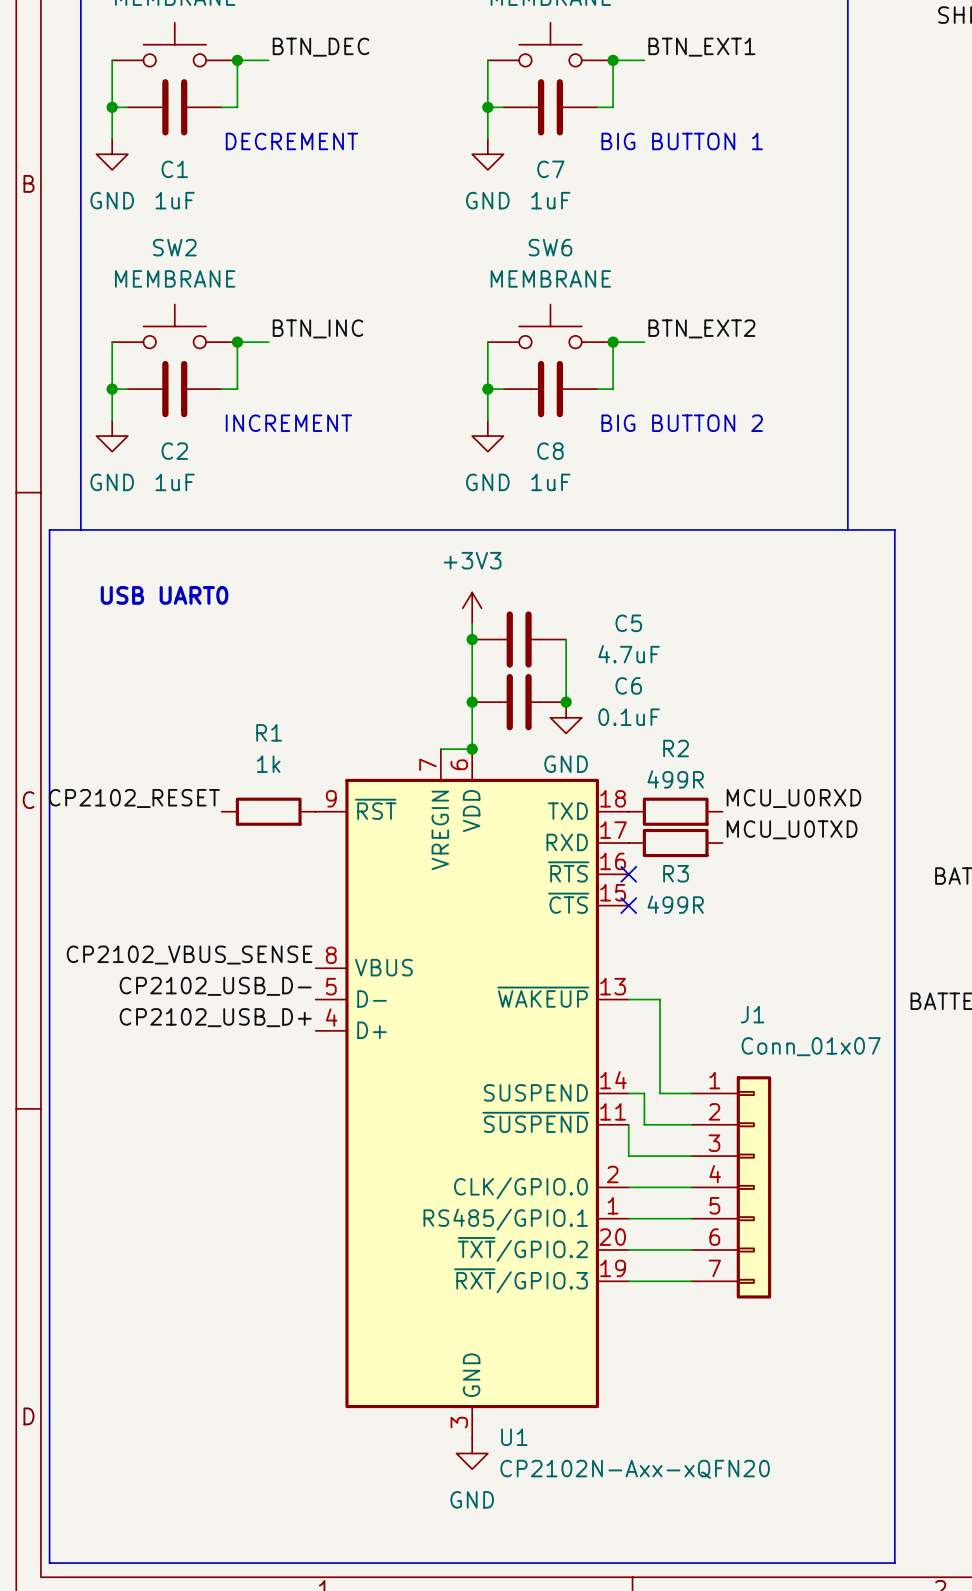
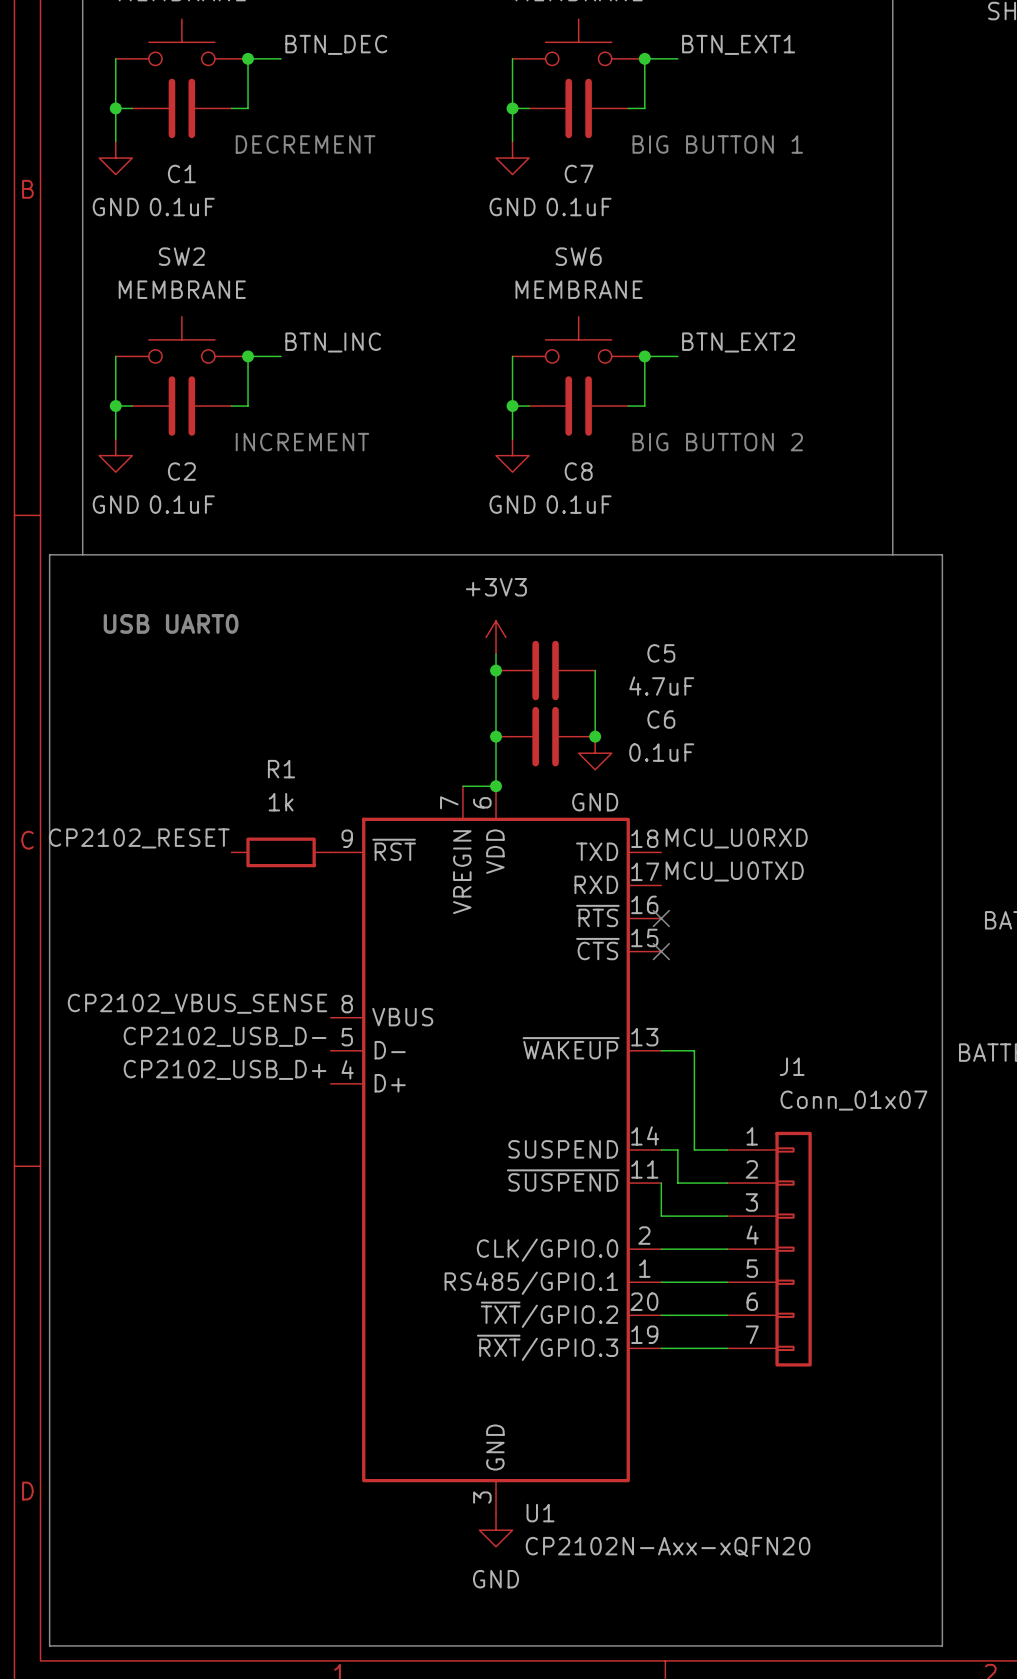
C1 value: 1uF (175, 200) -> 0.1uF (182, 207)
C7 value: 1uF (550, 200) -> 0.1uF (579, 207)
C2 value: 1uF (175, 482) -> 0.1uF (182, 504)
C8 value: 1uF (550, 482) -> 0.1uF (579, 504)
label position: MCU_U0RXD (793, 798) -> MCU_U0RXD (736, 838)
R2: 499R (675, 811) -> none
label position: MCU_U0TXD (792, 829) -> MCU_U0TXD (734, 871)
R3: 499R (675, 843) -> none

